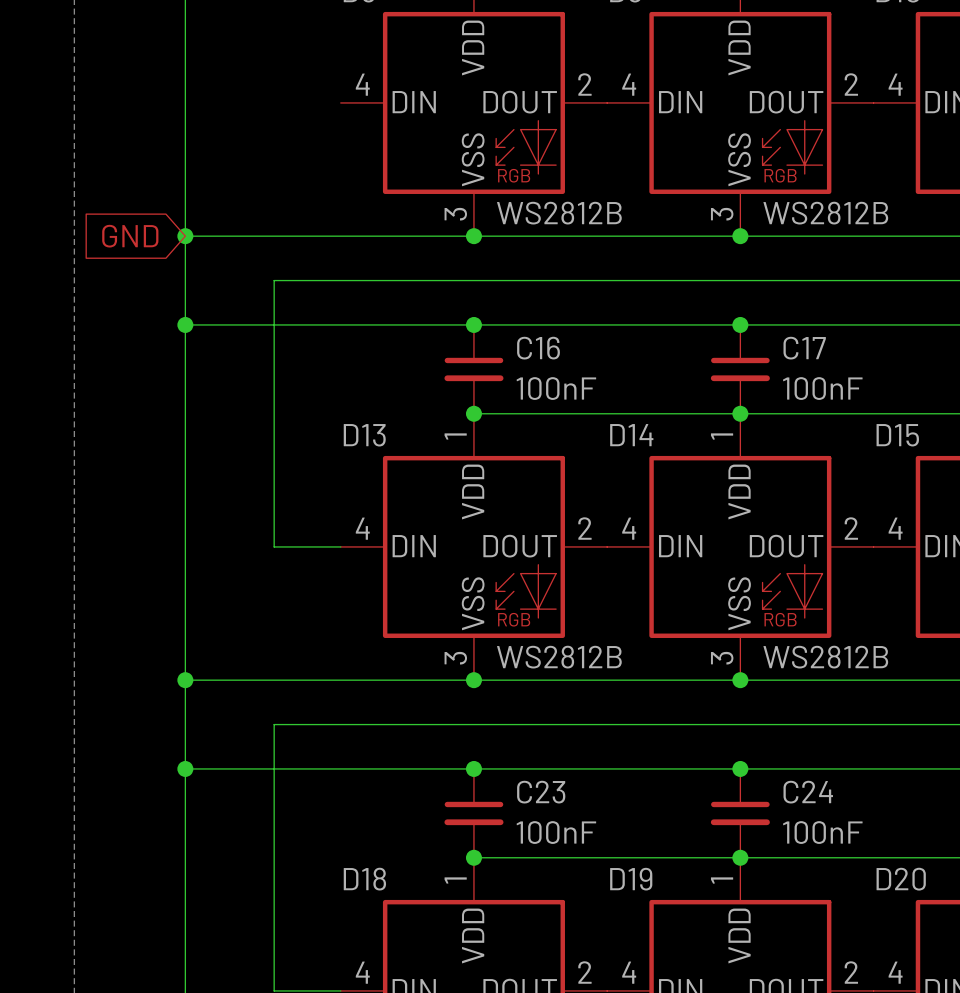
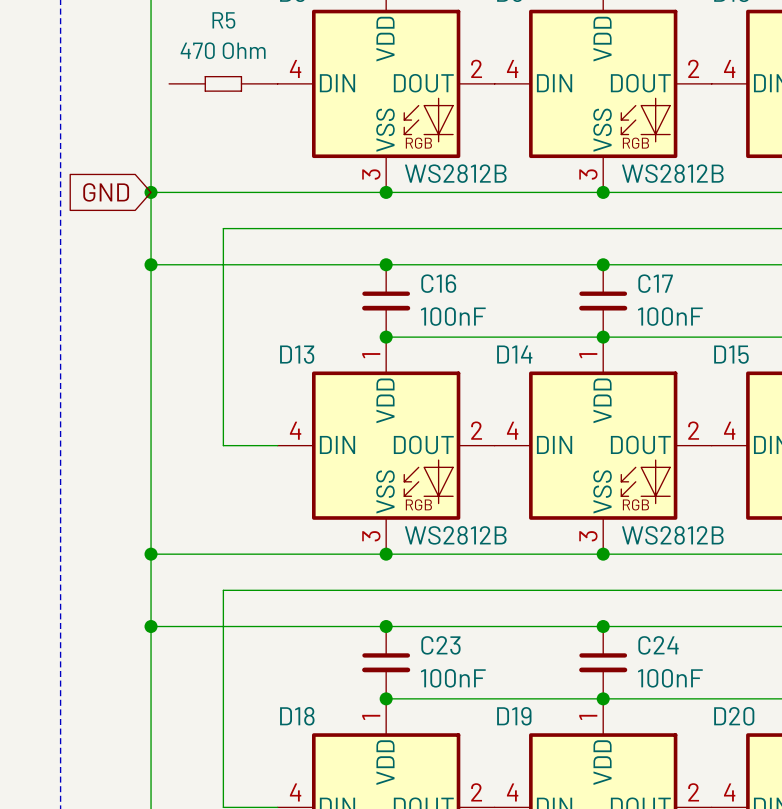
R5: none -> 470 Ohm (223, 83)

